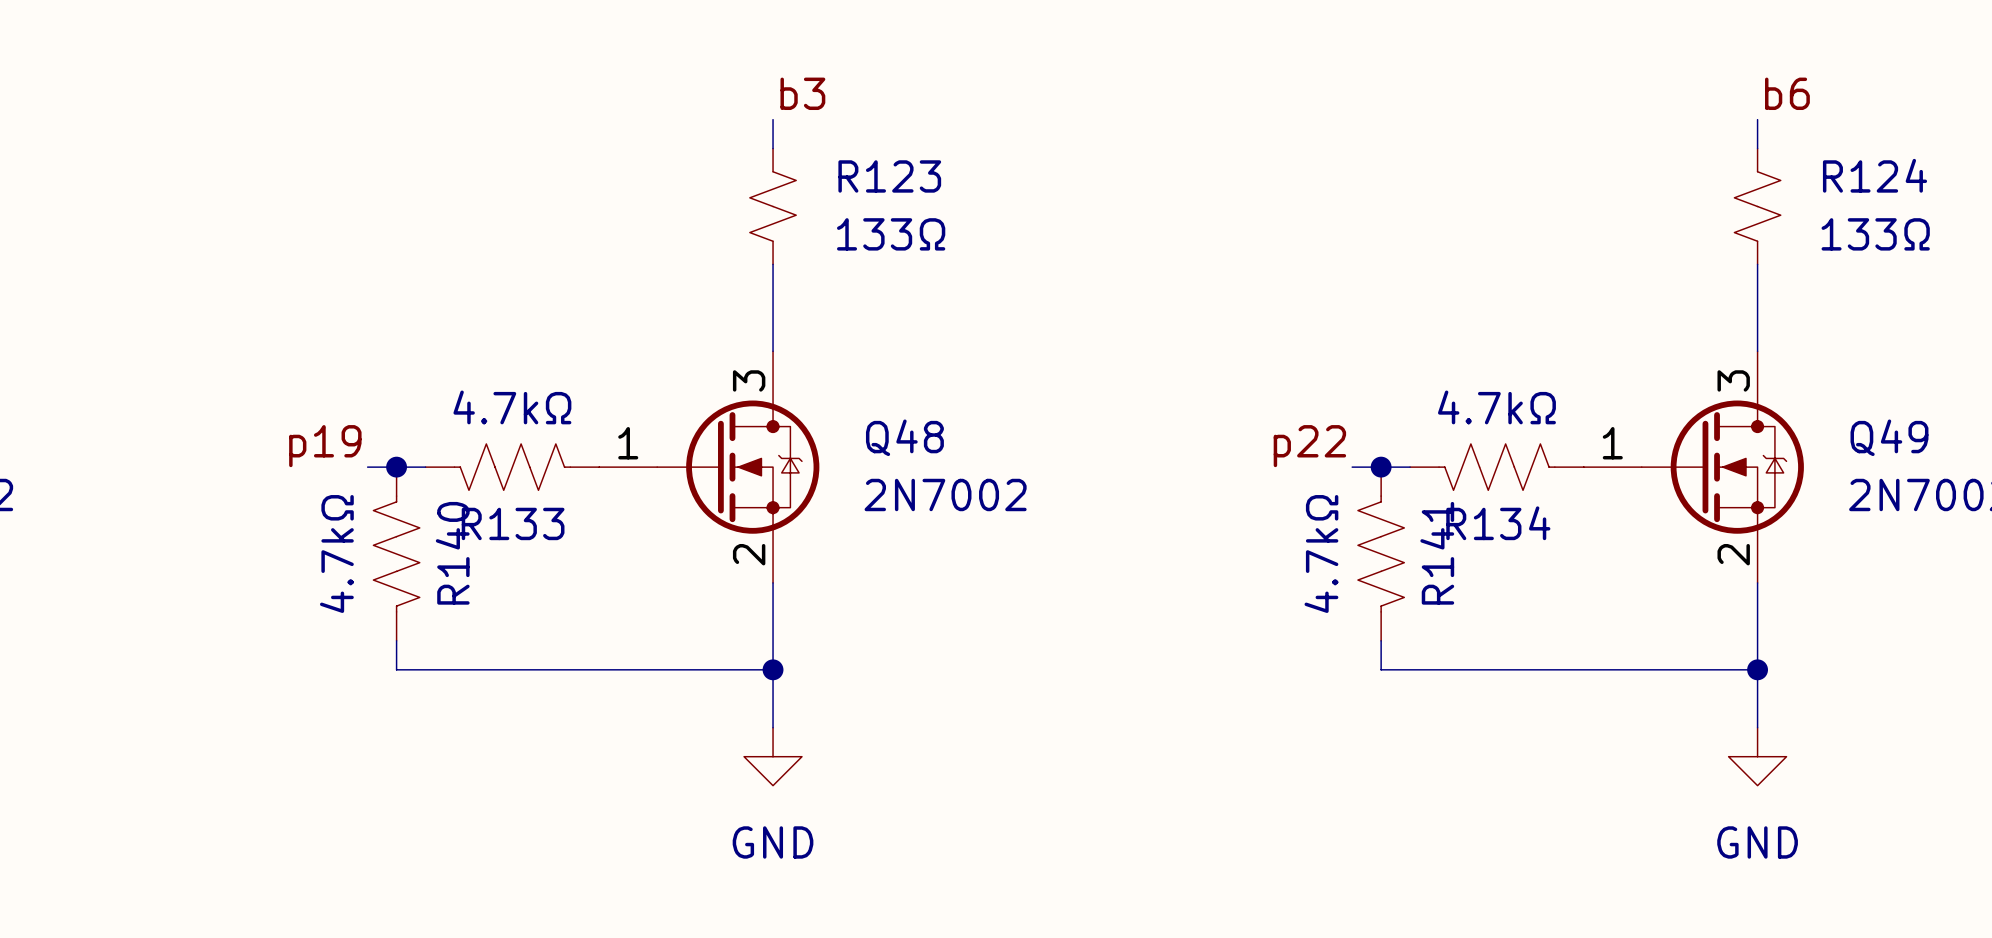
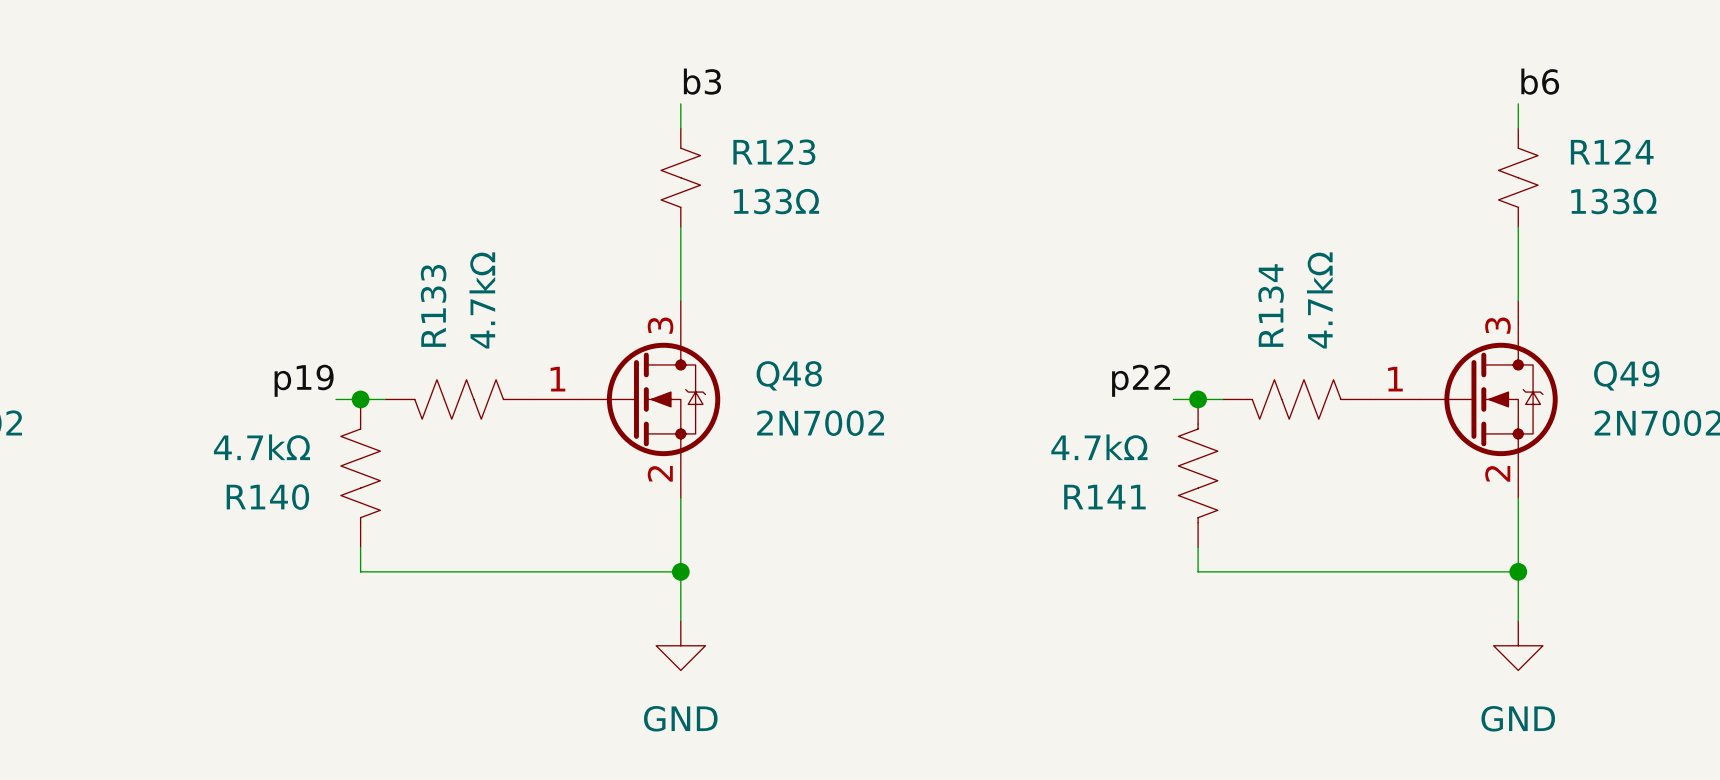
R133 value rotation: 0° (512, 407) -> 90° counterclockwise (482, 300)
R134 value rotation: 0° (1496, 407) -> 90° counterclockwise (1319, 300)
R133 name rotation: 0° (513, 523) -> 90° counterclockwise (433, 305)
R133 name position: R133 (513, 523) -> R133 (433, 305)
R134 name rotation: 0° (1498, 523) -> 90° counterclockwise (1271, 305)
R134 name position: R134 (1498, 523) -> R134 (1271, 305)
R140 value rotation: 0° (336, 553) -> 90° clockwise (261, 447)
R140 name rotation: 0° (452, 553) -> 90° clockwise (267, 497)
R140 name position: R140 (452, 553) -> R140 (267, 497)
R141 value rotation: 0° (1321, 553) -> 90° clockwise (1099, 447)
R141 name rotation: 0° (1437, 553) -> 90° clockwise (1104, 497)
R141 name position: R141 (1437, 553) -> R141 (1104, 497)

